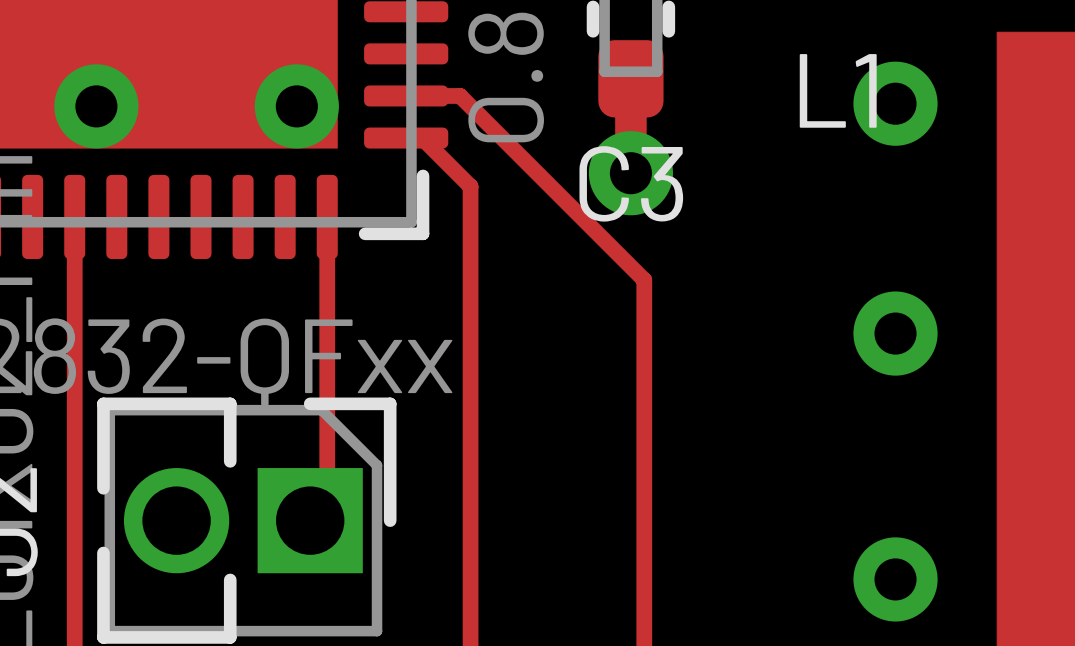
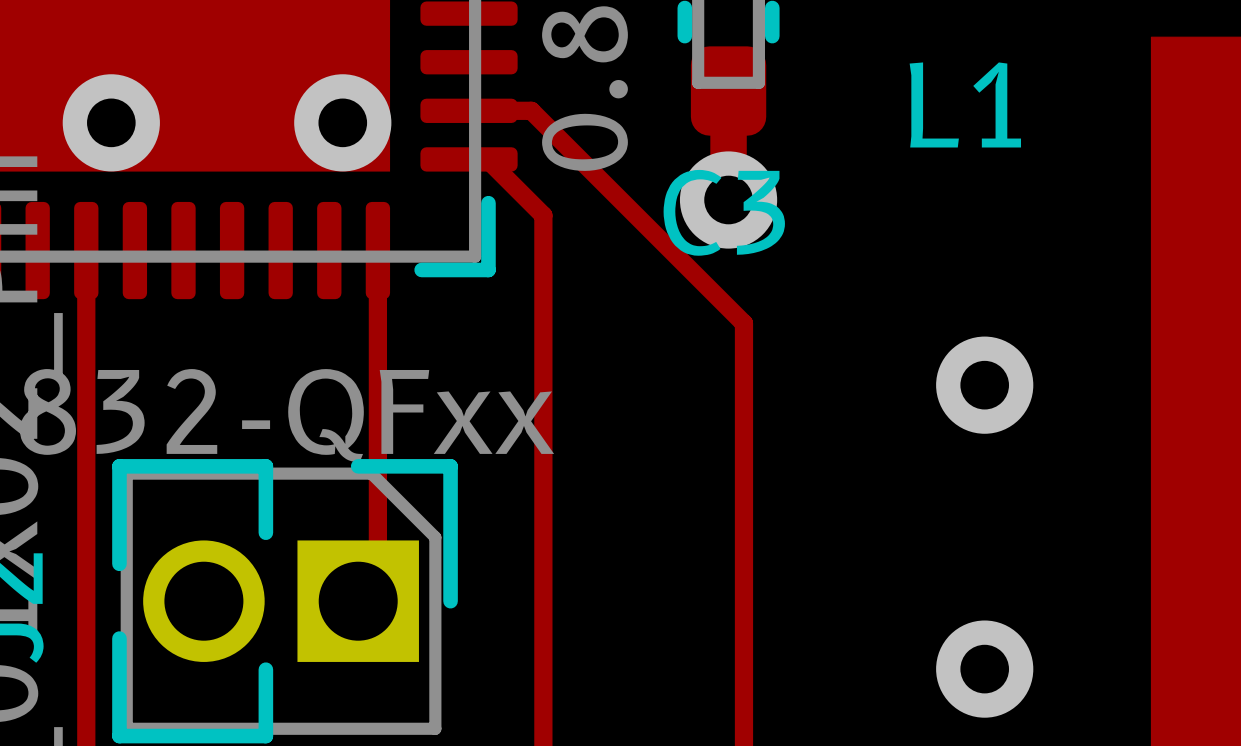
via: (895, 103) -> none
via position: (895, 333) -> (984, 385)
via position: (895, 579) -> (984, 669)

